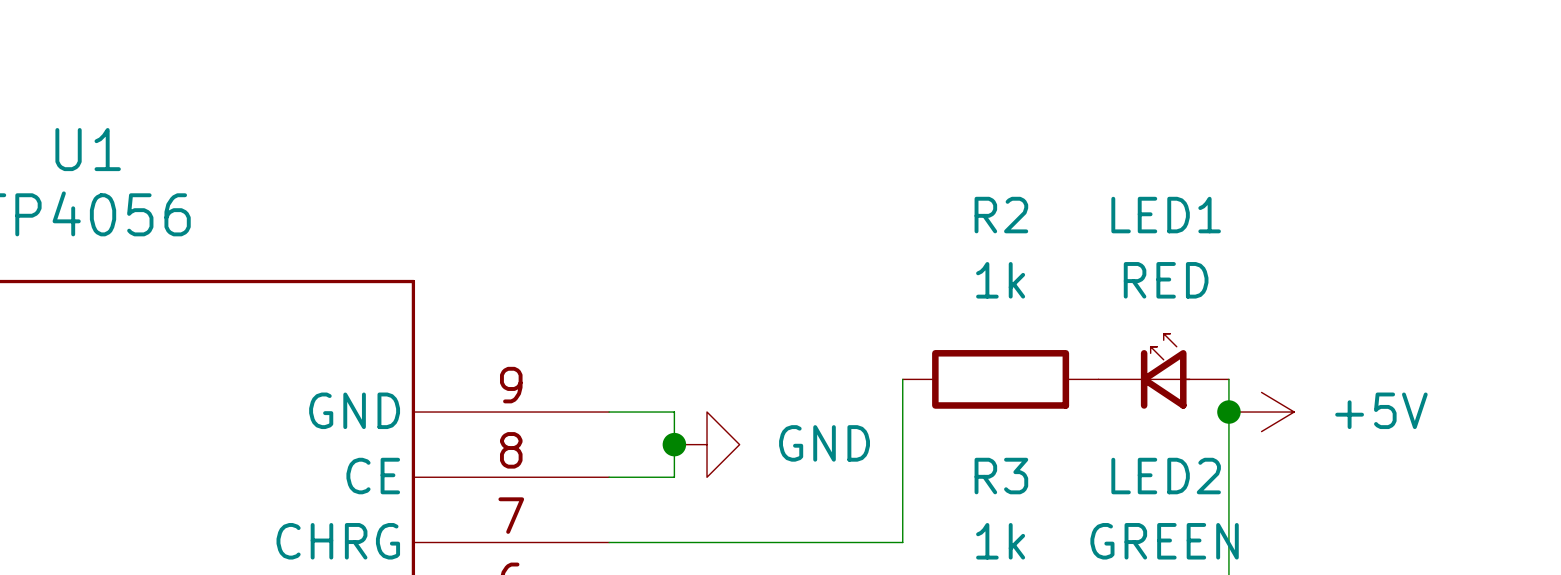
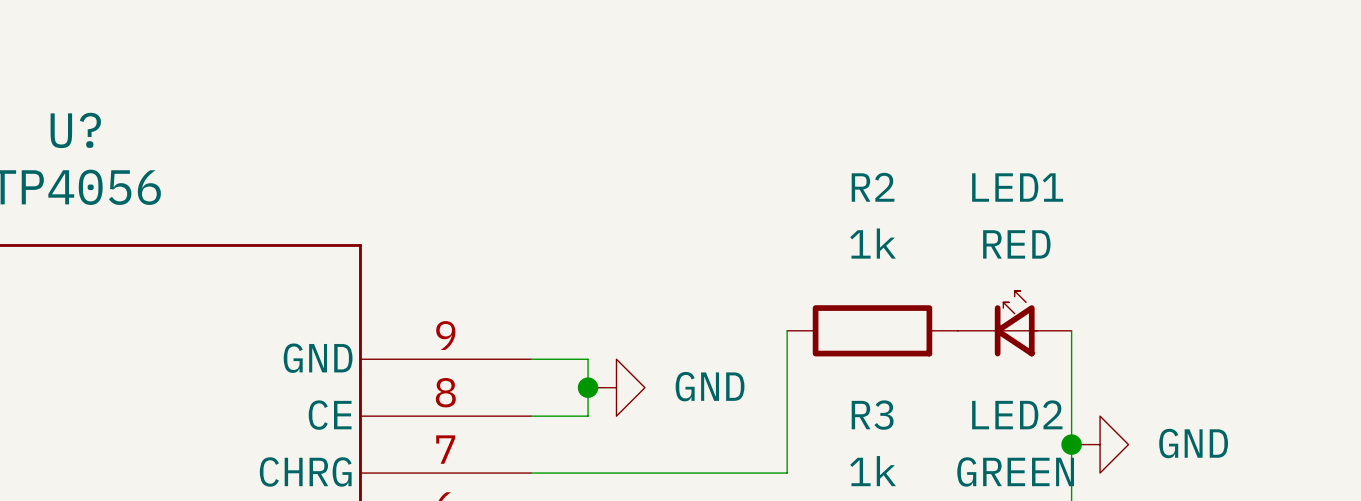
U1 name: U1 (88, 149) -> U? (75, 130)
junction position: (1228, 412) -> (1071, 444)
power symbol: +5V (1261, 412) -> none
power symbol: none -> GND (1100, 444)

